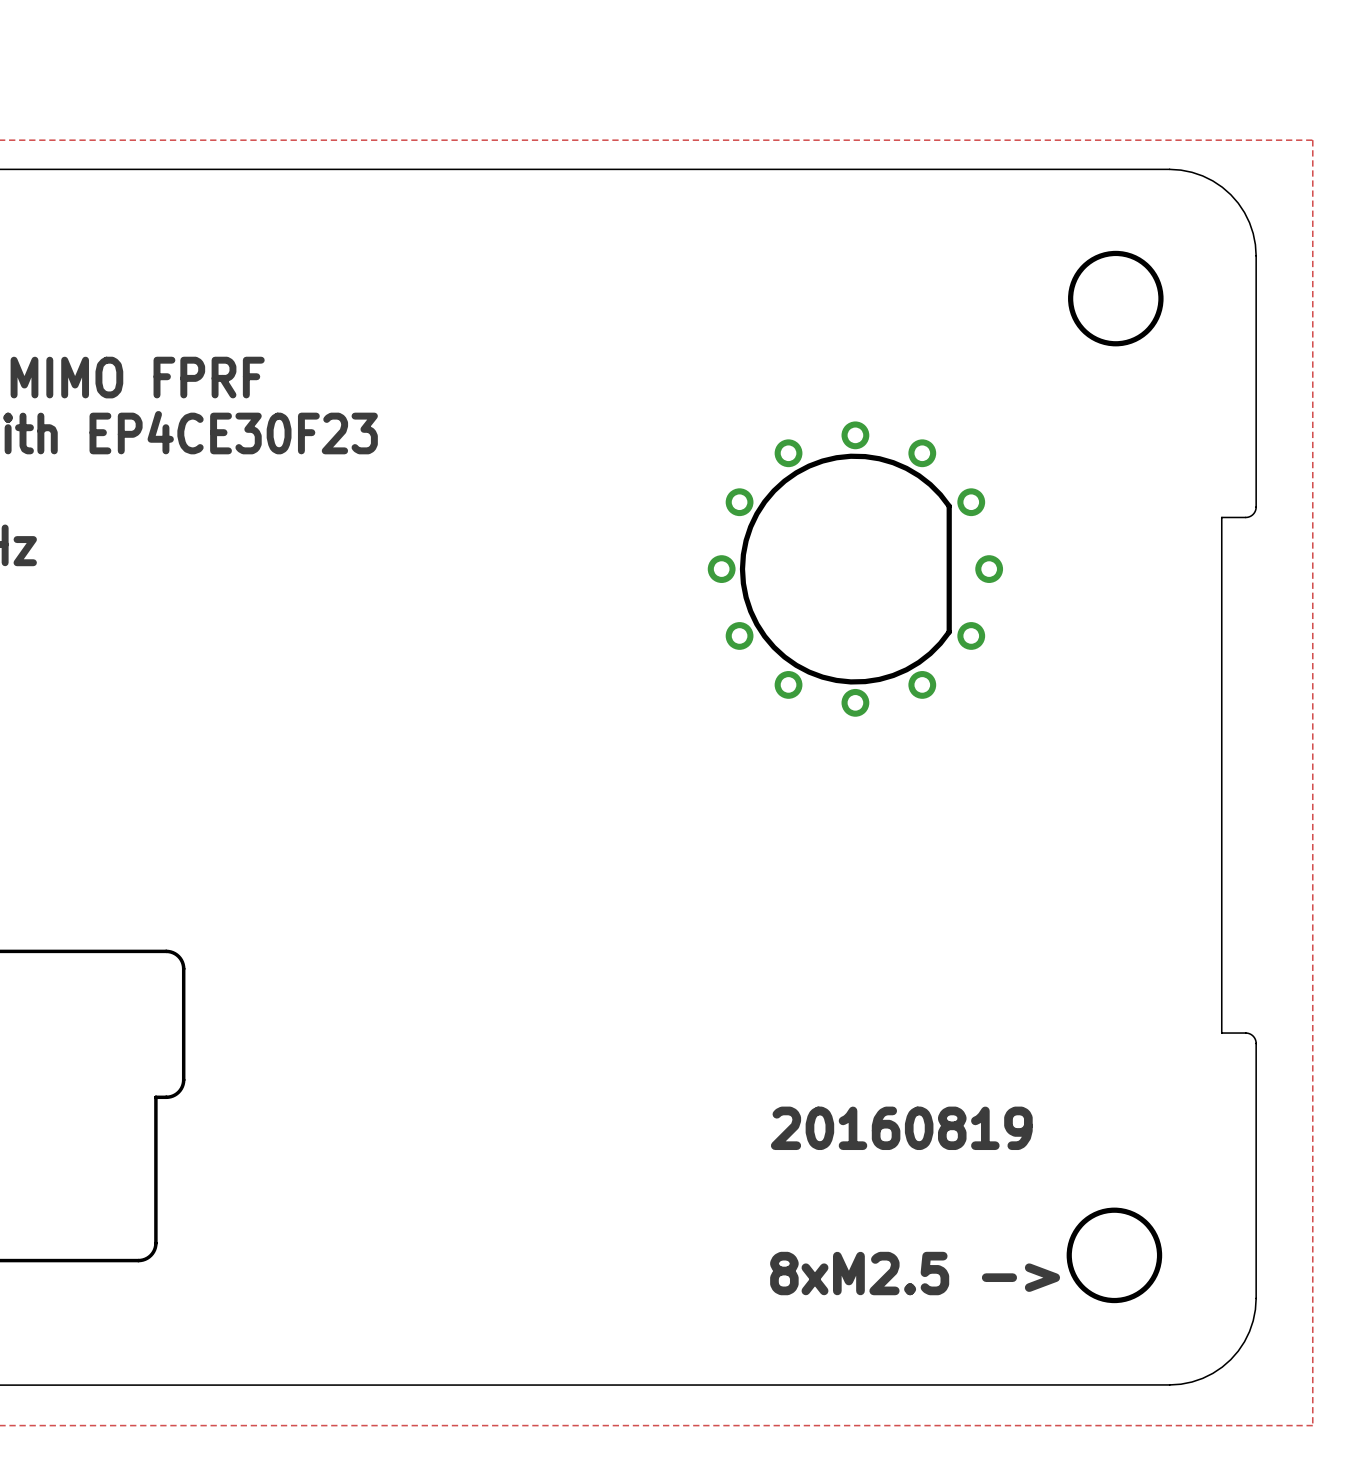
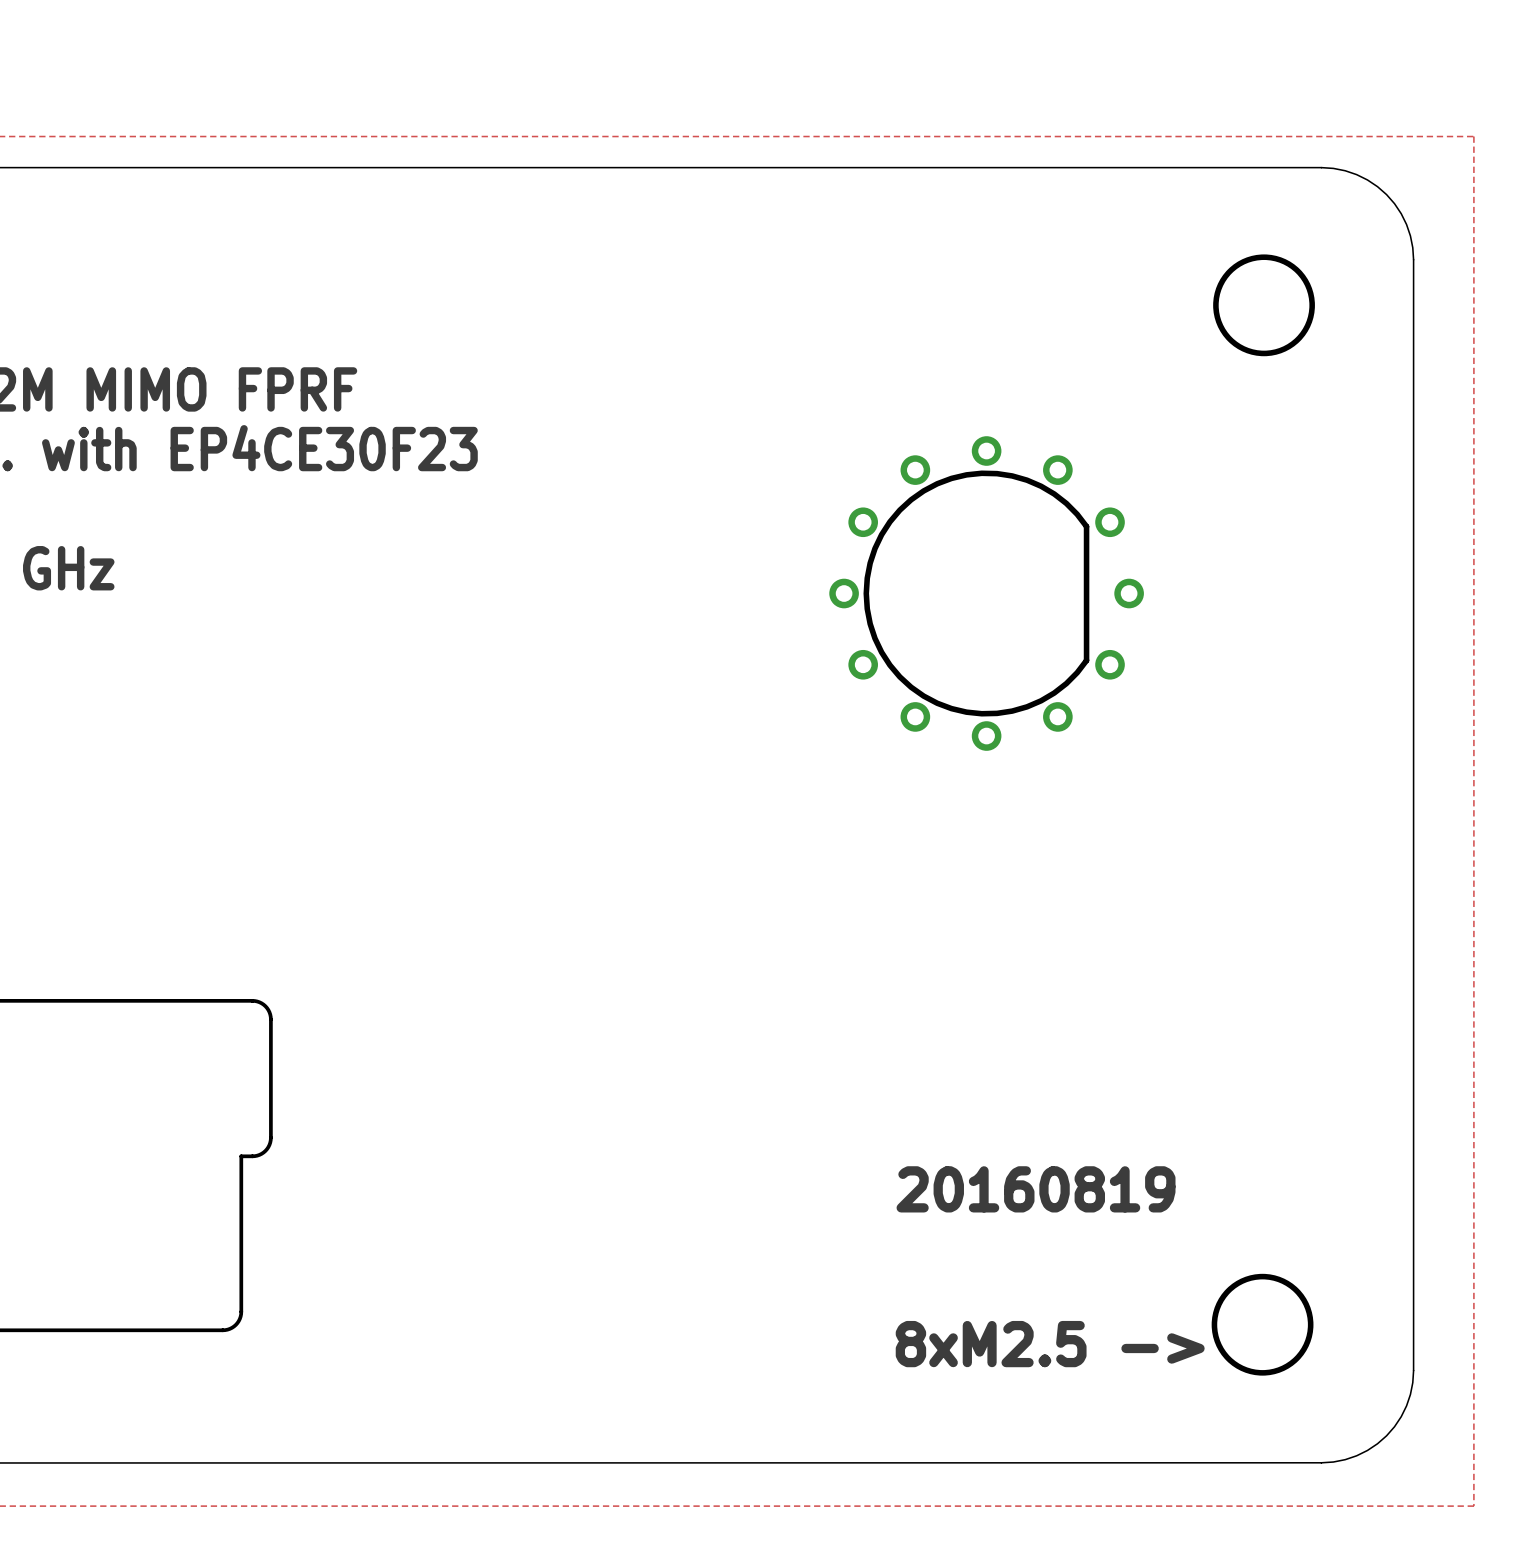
board edge: (1256, 507) (1254, 513) (1248, 517) (1221, 517) (1221, 1033) (1248, 1033) (1254, 1037) (1256, 1043) -> (1413, 527) (1413, 1098)

